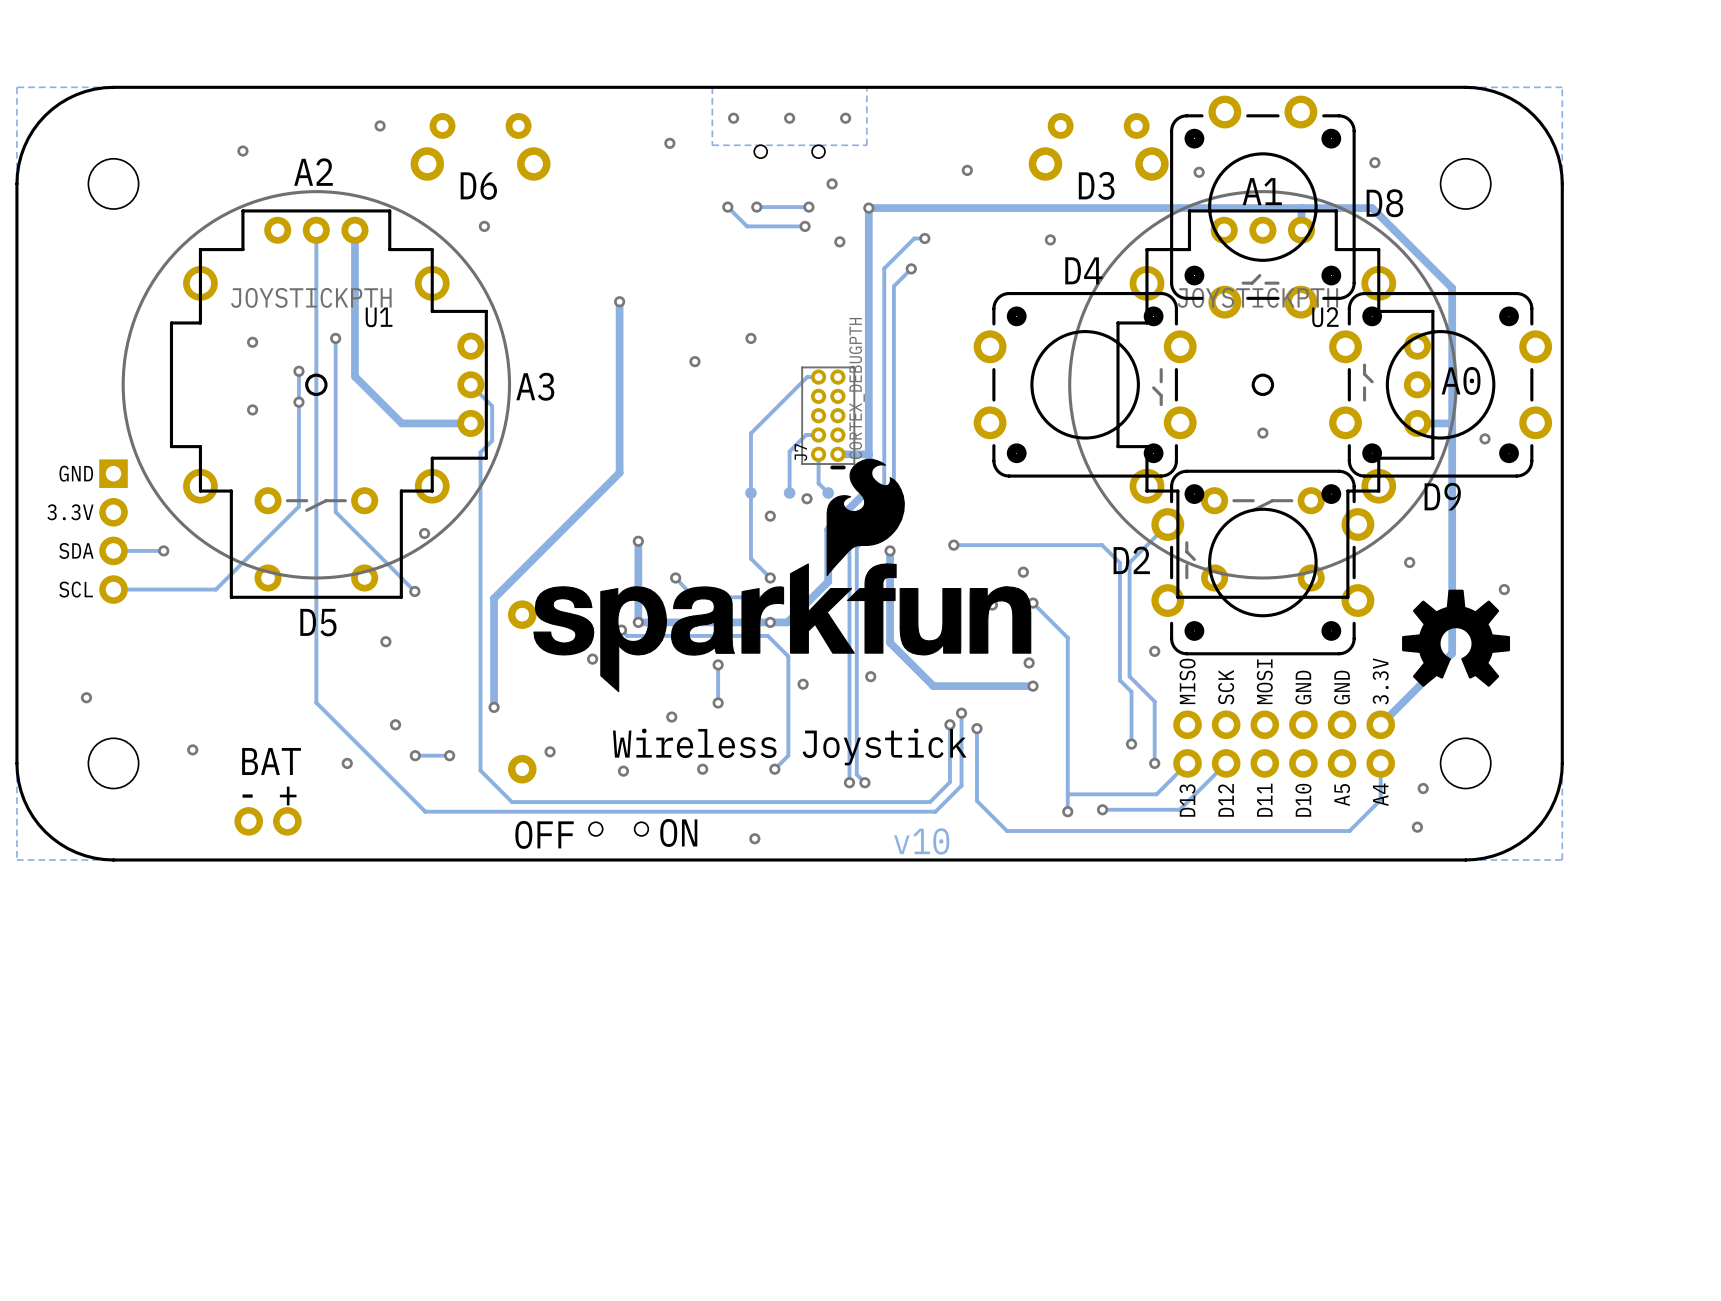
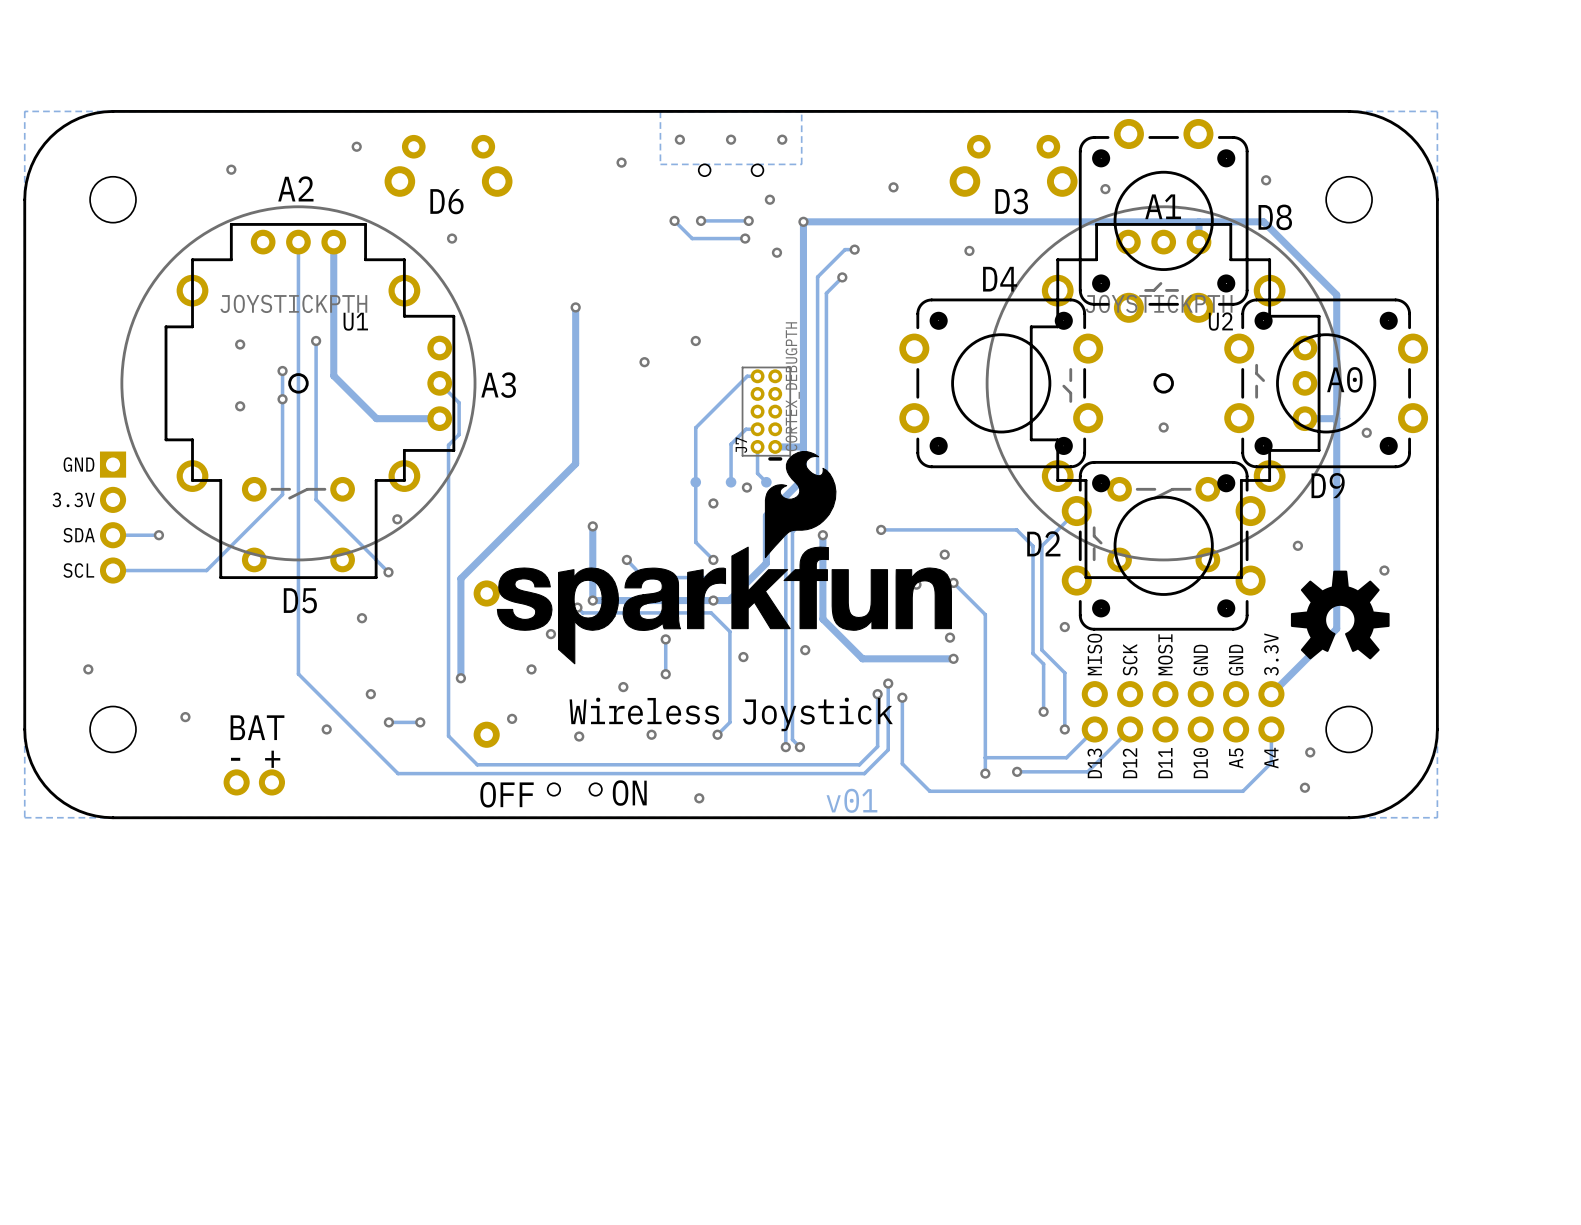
via: none -> (531, 669)
text: v10 (921, 841) -> v01 (851, 800)

